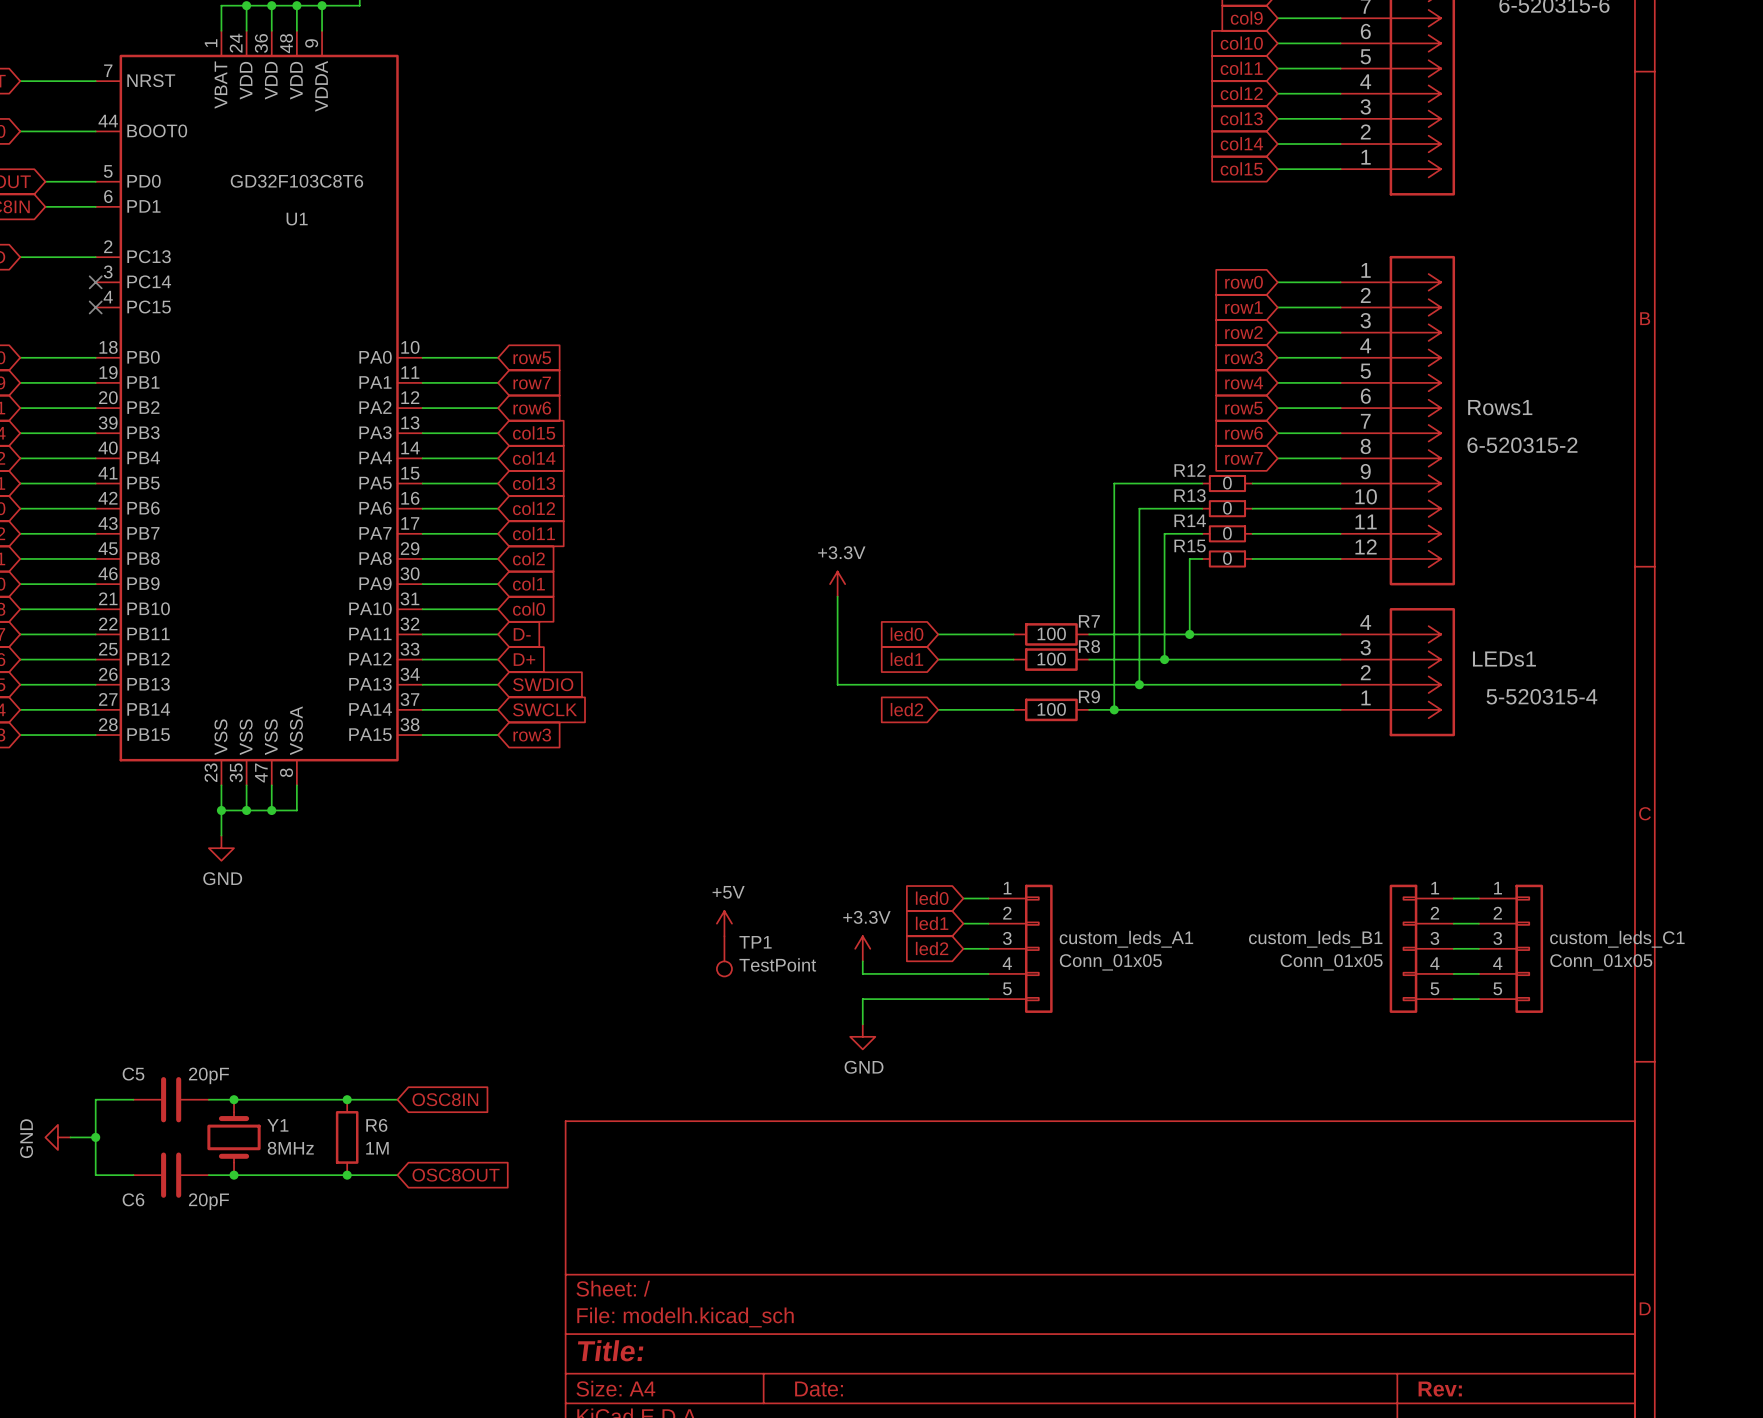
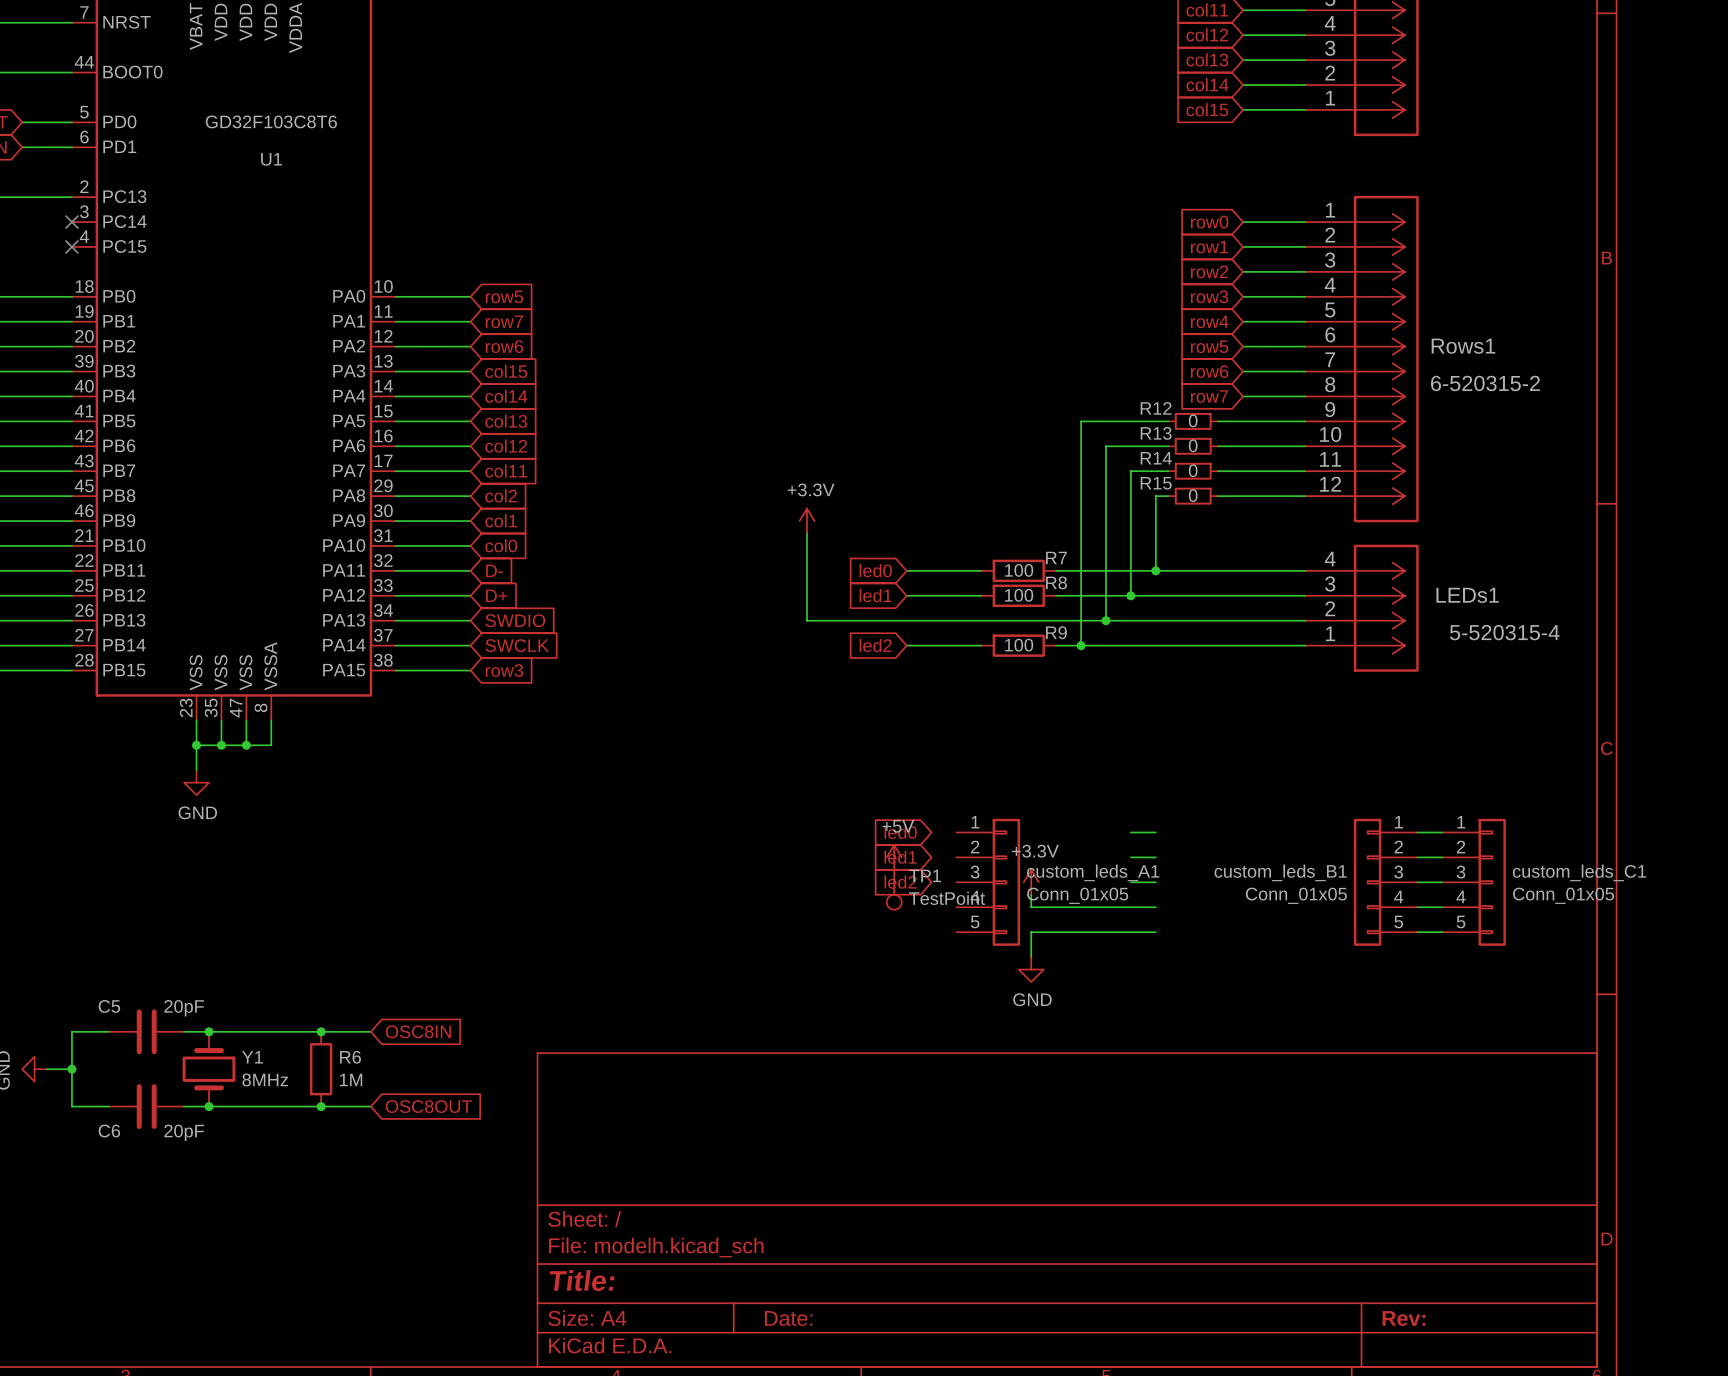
wire: (963, 898) (988, 898) -> (1130, 832) (1155, 832)
power symbol position: +5V (724, 923) -> +5V (894, 857)
wire: (963, 923) (988, 923) -> (1130, 857) (1155, 857)
power symbol position: +3.3V (862, 948) -> +3.3V (1031, 882)
wire: (963, 948) (988, 948) -> (1130, 882) (1155, 882)
TP1 position: (724, 956) -> (894, 889)
wire: (862, 961) (862, 973) (988, 973) -> (1031, 894) (1031, 907) (1155, 907)
wire: (988, 999) (862, 999) (862, 1024) -> (1155, 932) (1031, 932) (1031, 957)
power symbol position: GND (862, 1036) -> GND (1031, 969)

